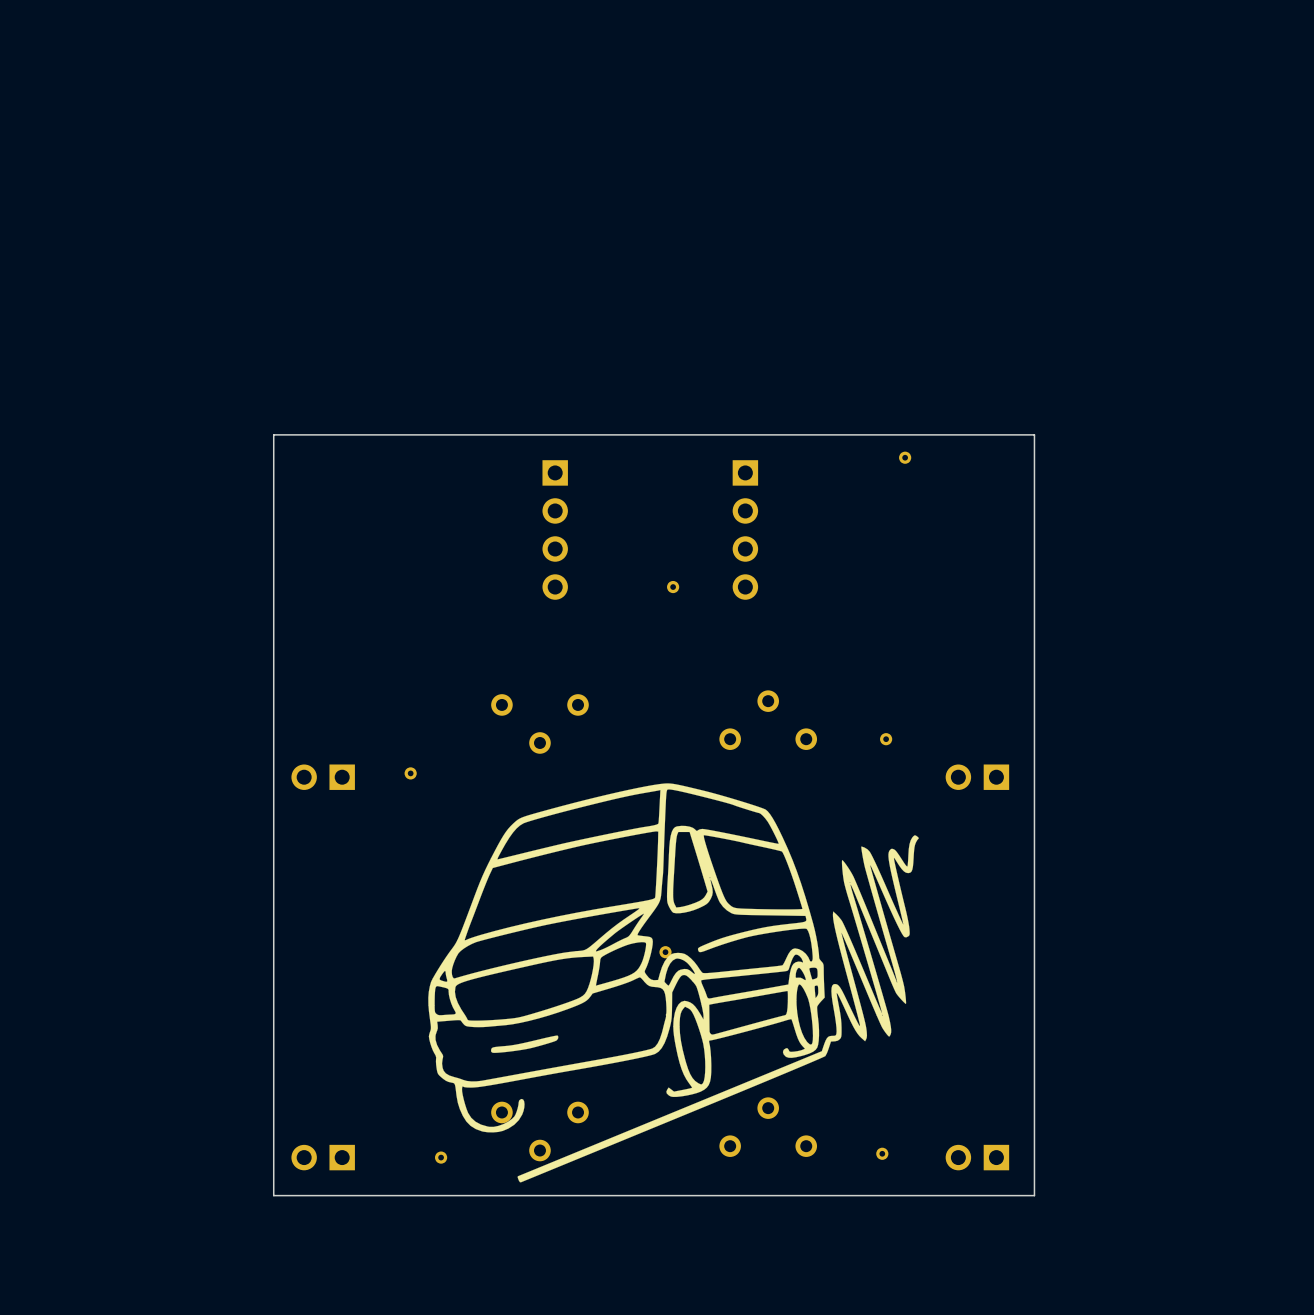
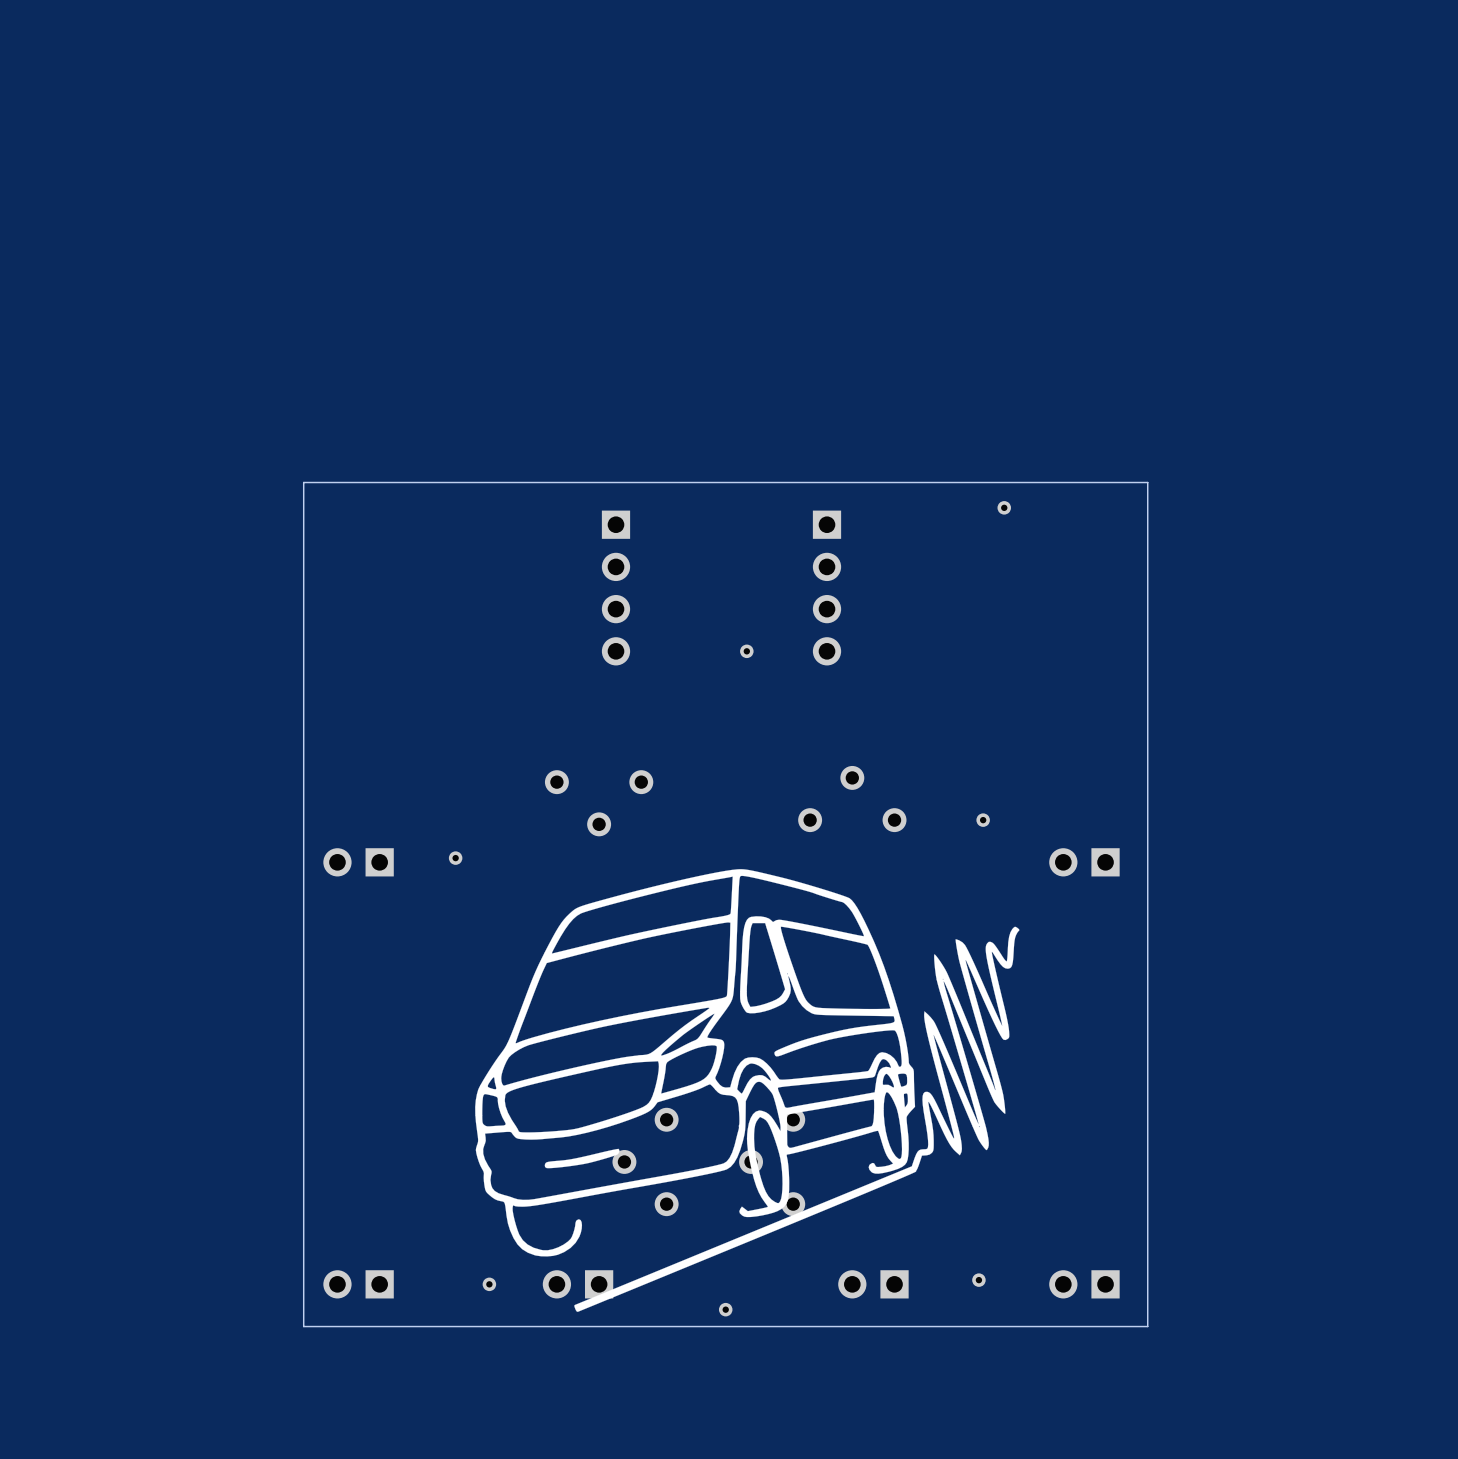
part position: (665, 952) -> (725, 1309)
part: none -> (645, 1161)
part: none -> (772, 1161)
part: (768, 1127) -> none
part: (539, 1131) -> none
part: none -> (578, 1284)
part: none -> (873, 1284)

